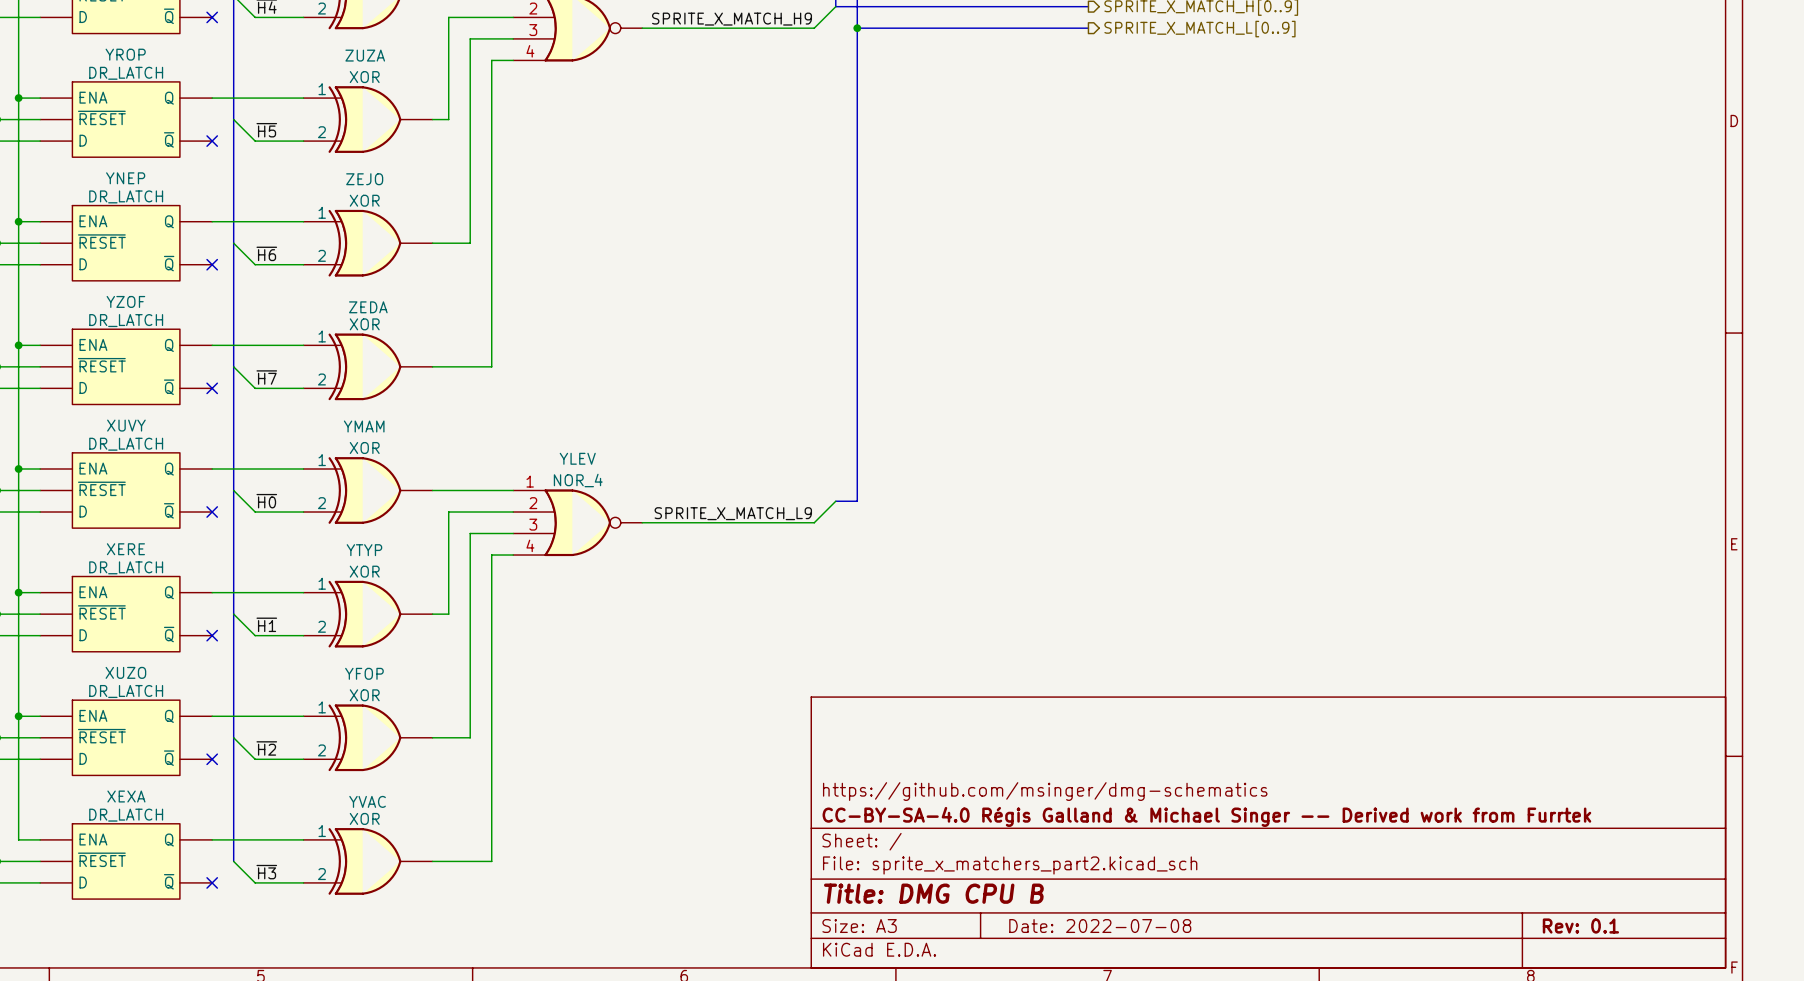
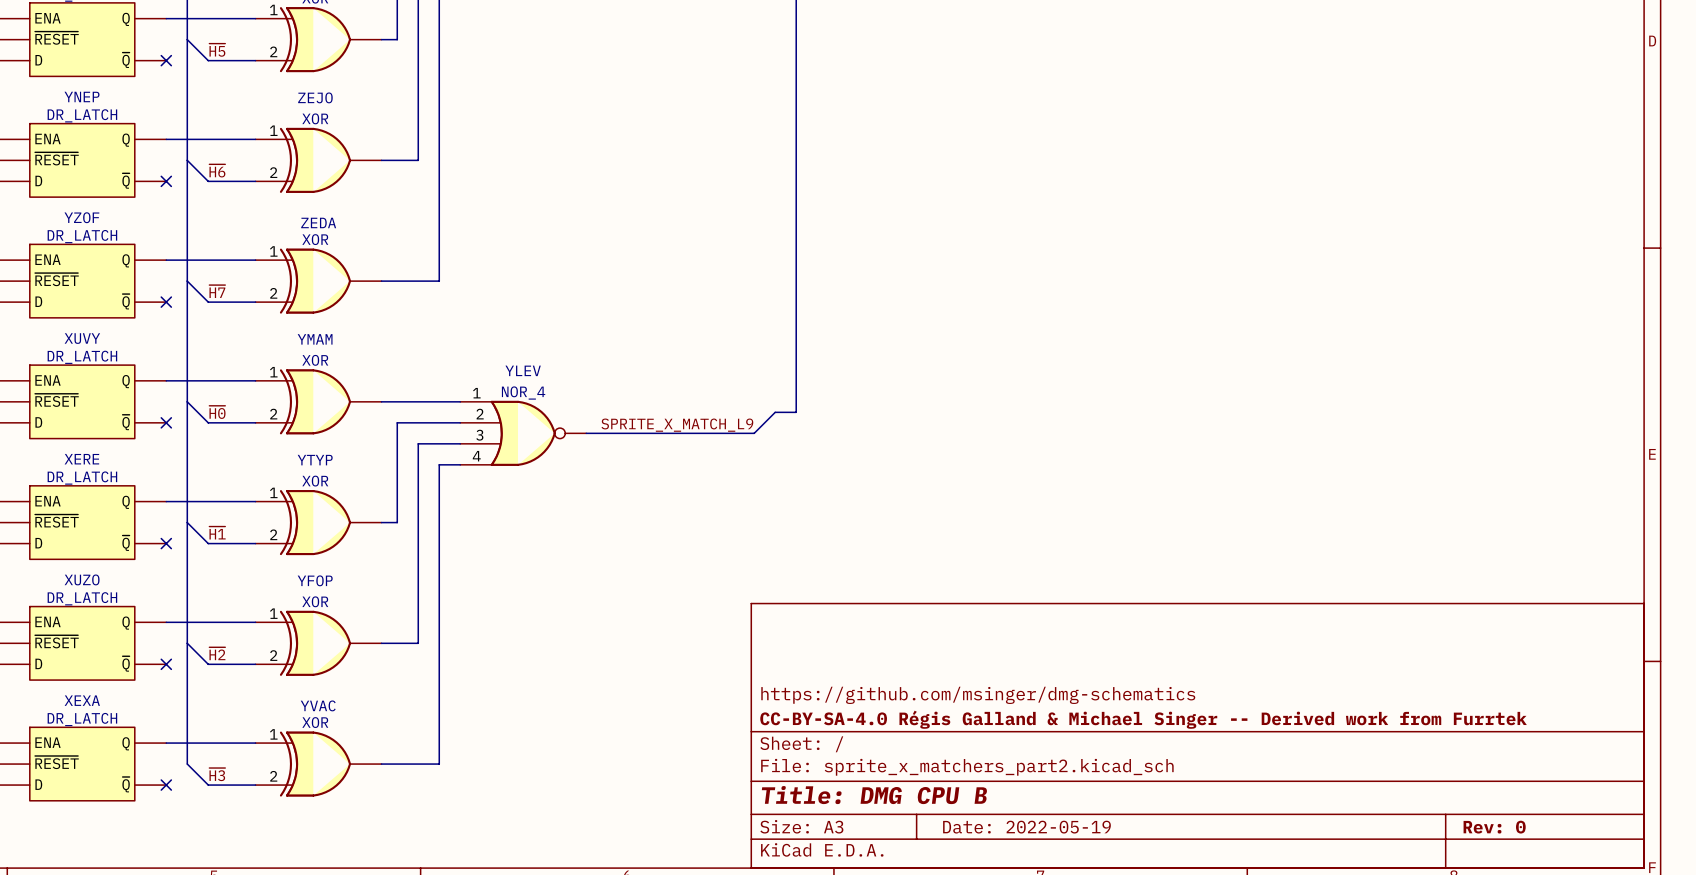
title block: Date: 2022-07-08 (1100, 926) -> Date: 2022-05-19 (1026, 827)
title block: Rev: 0.1 (1580, 926) -> Rev: 0 (1494, 827)

